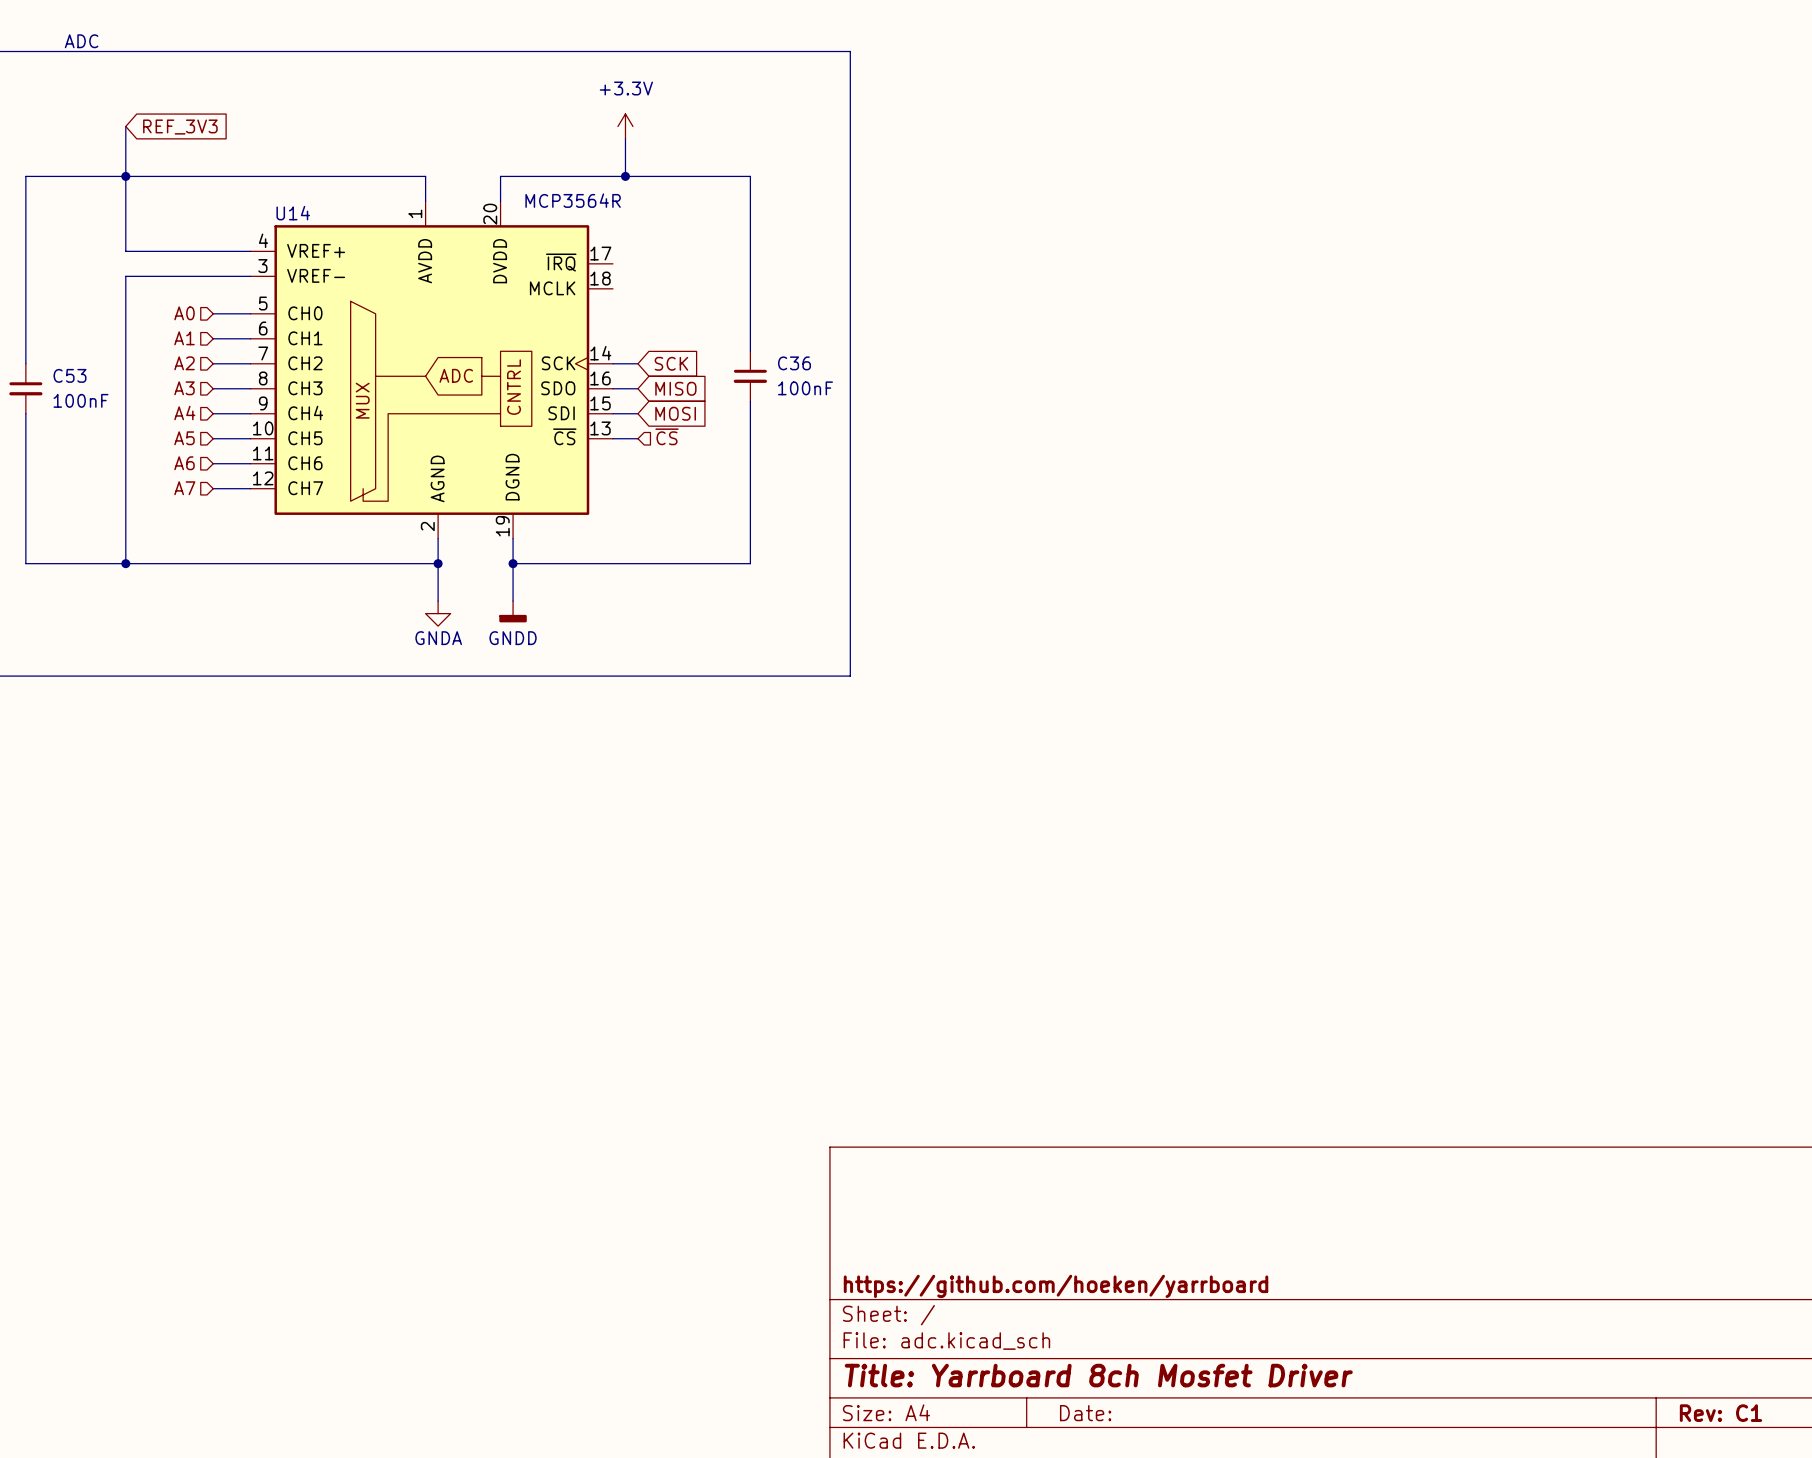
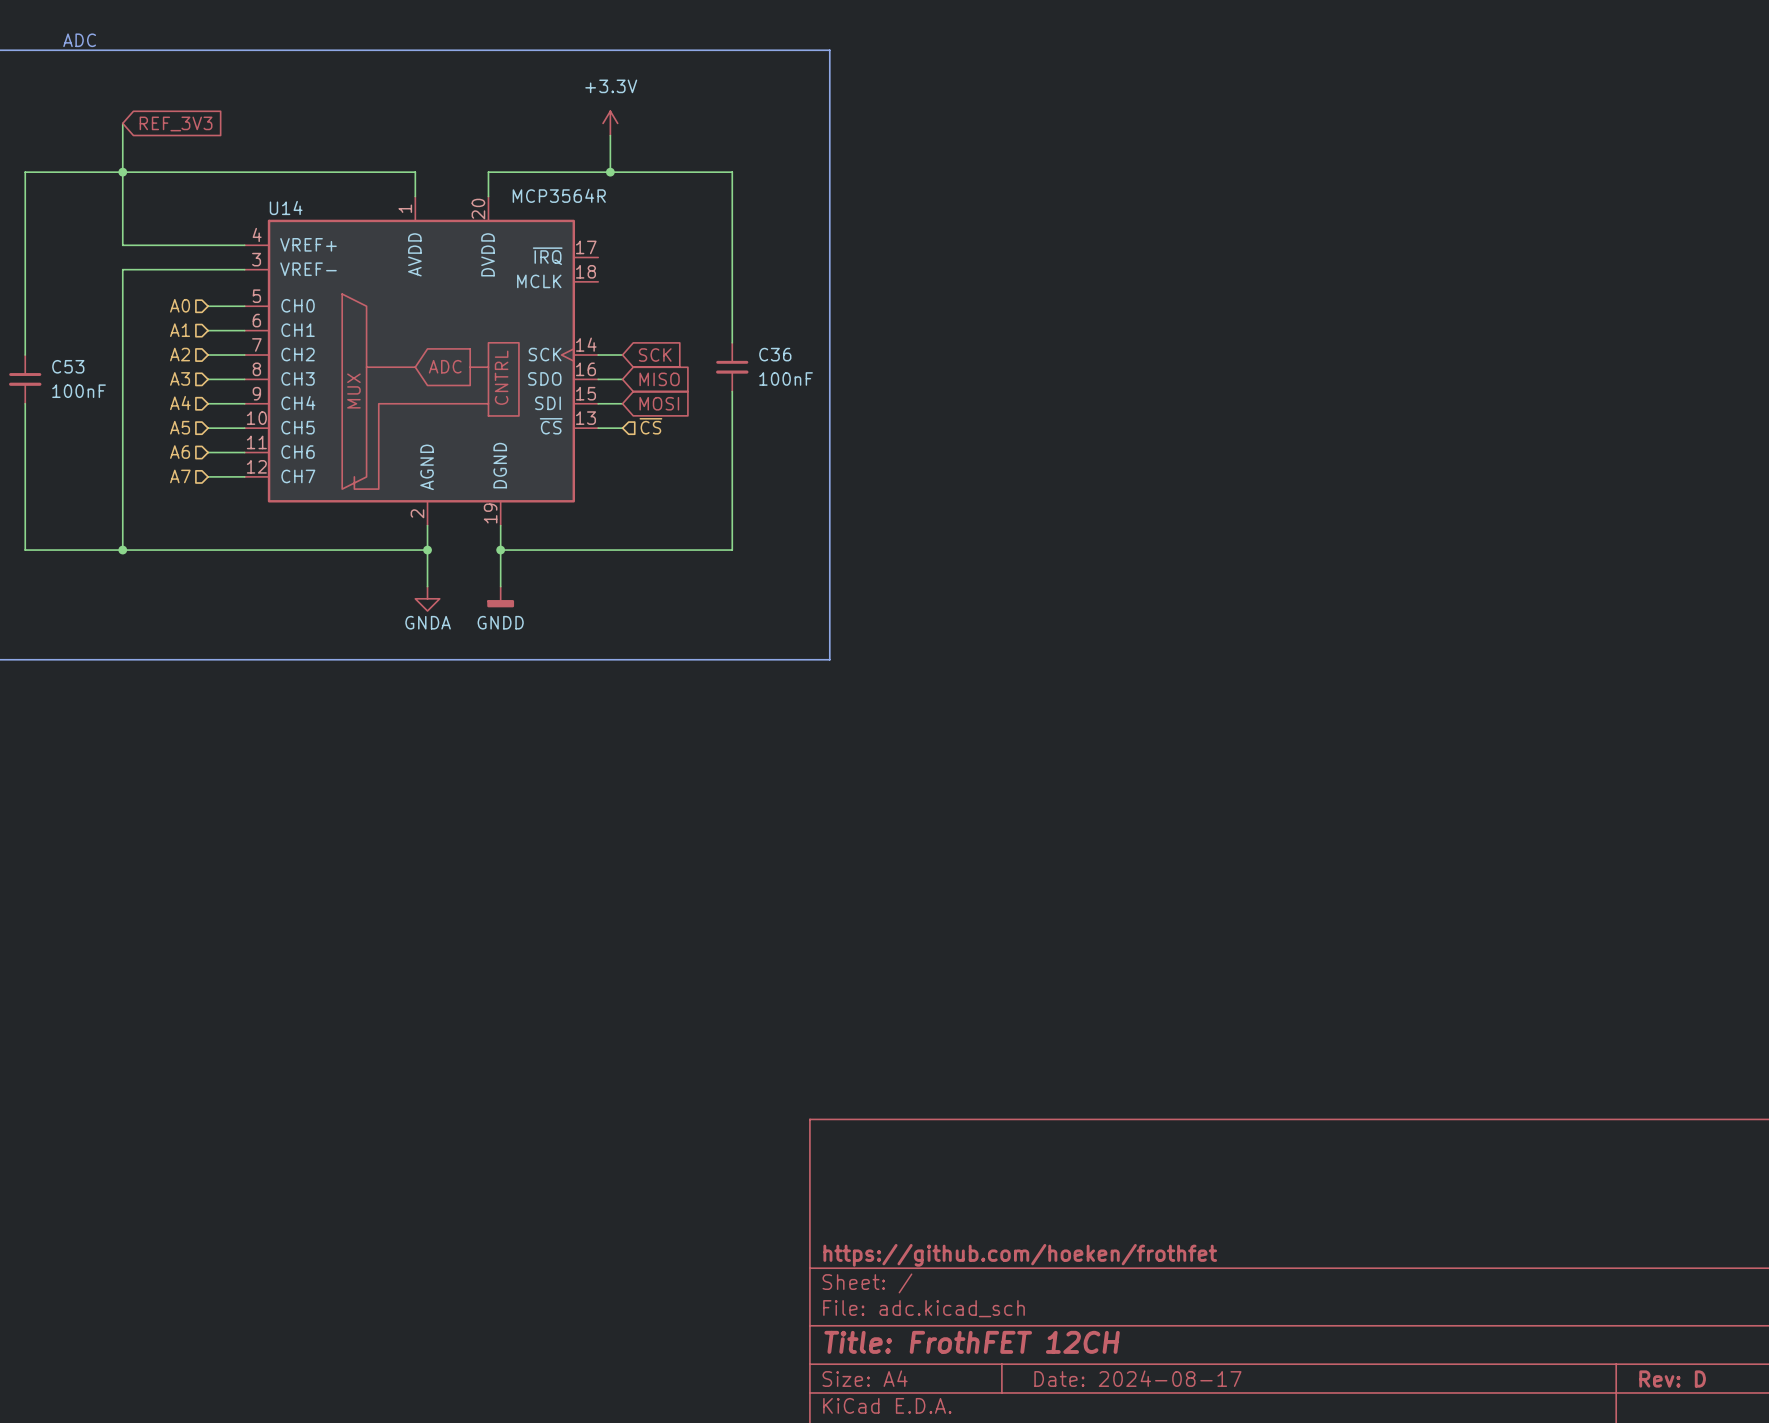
title block: https://github.com/hoeken/yarrboard (1056, 1286) -> https://github.com/hoeken/frothfet (1020, 1255)
title block: Title: Yarrboard 8ch Mosfet Driver (1098, 1375) -> Title: FrothFET 12CH (972, 1342)
title block: Date: (1085, 1413) -> Date: 2024-08-17 (1137, 1378)
title block: Rev: C1 (1721, 1413) -> Rev: D (1672, 1379)

